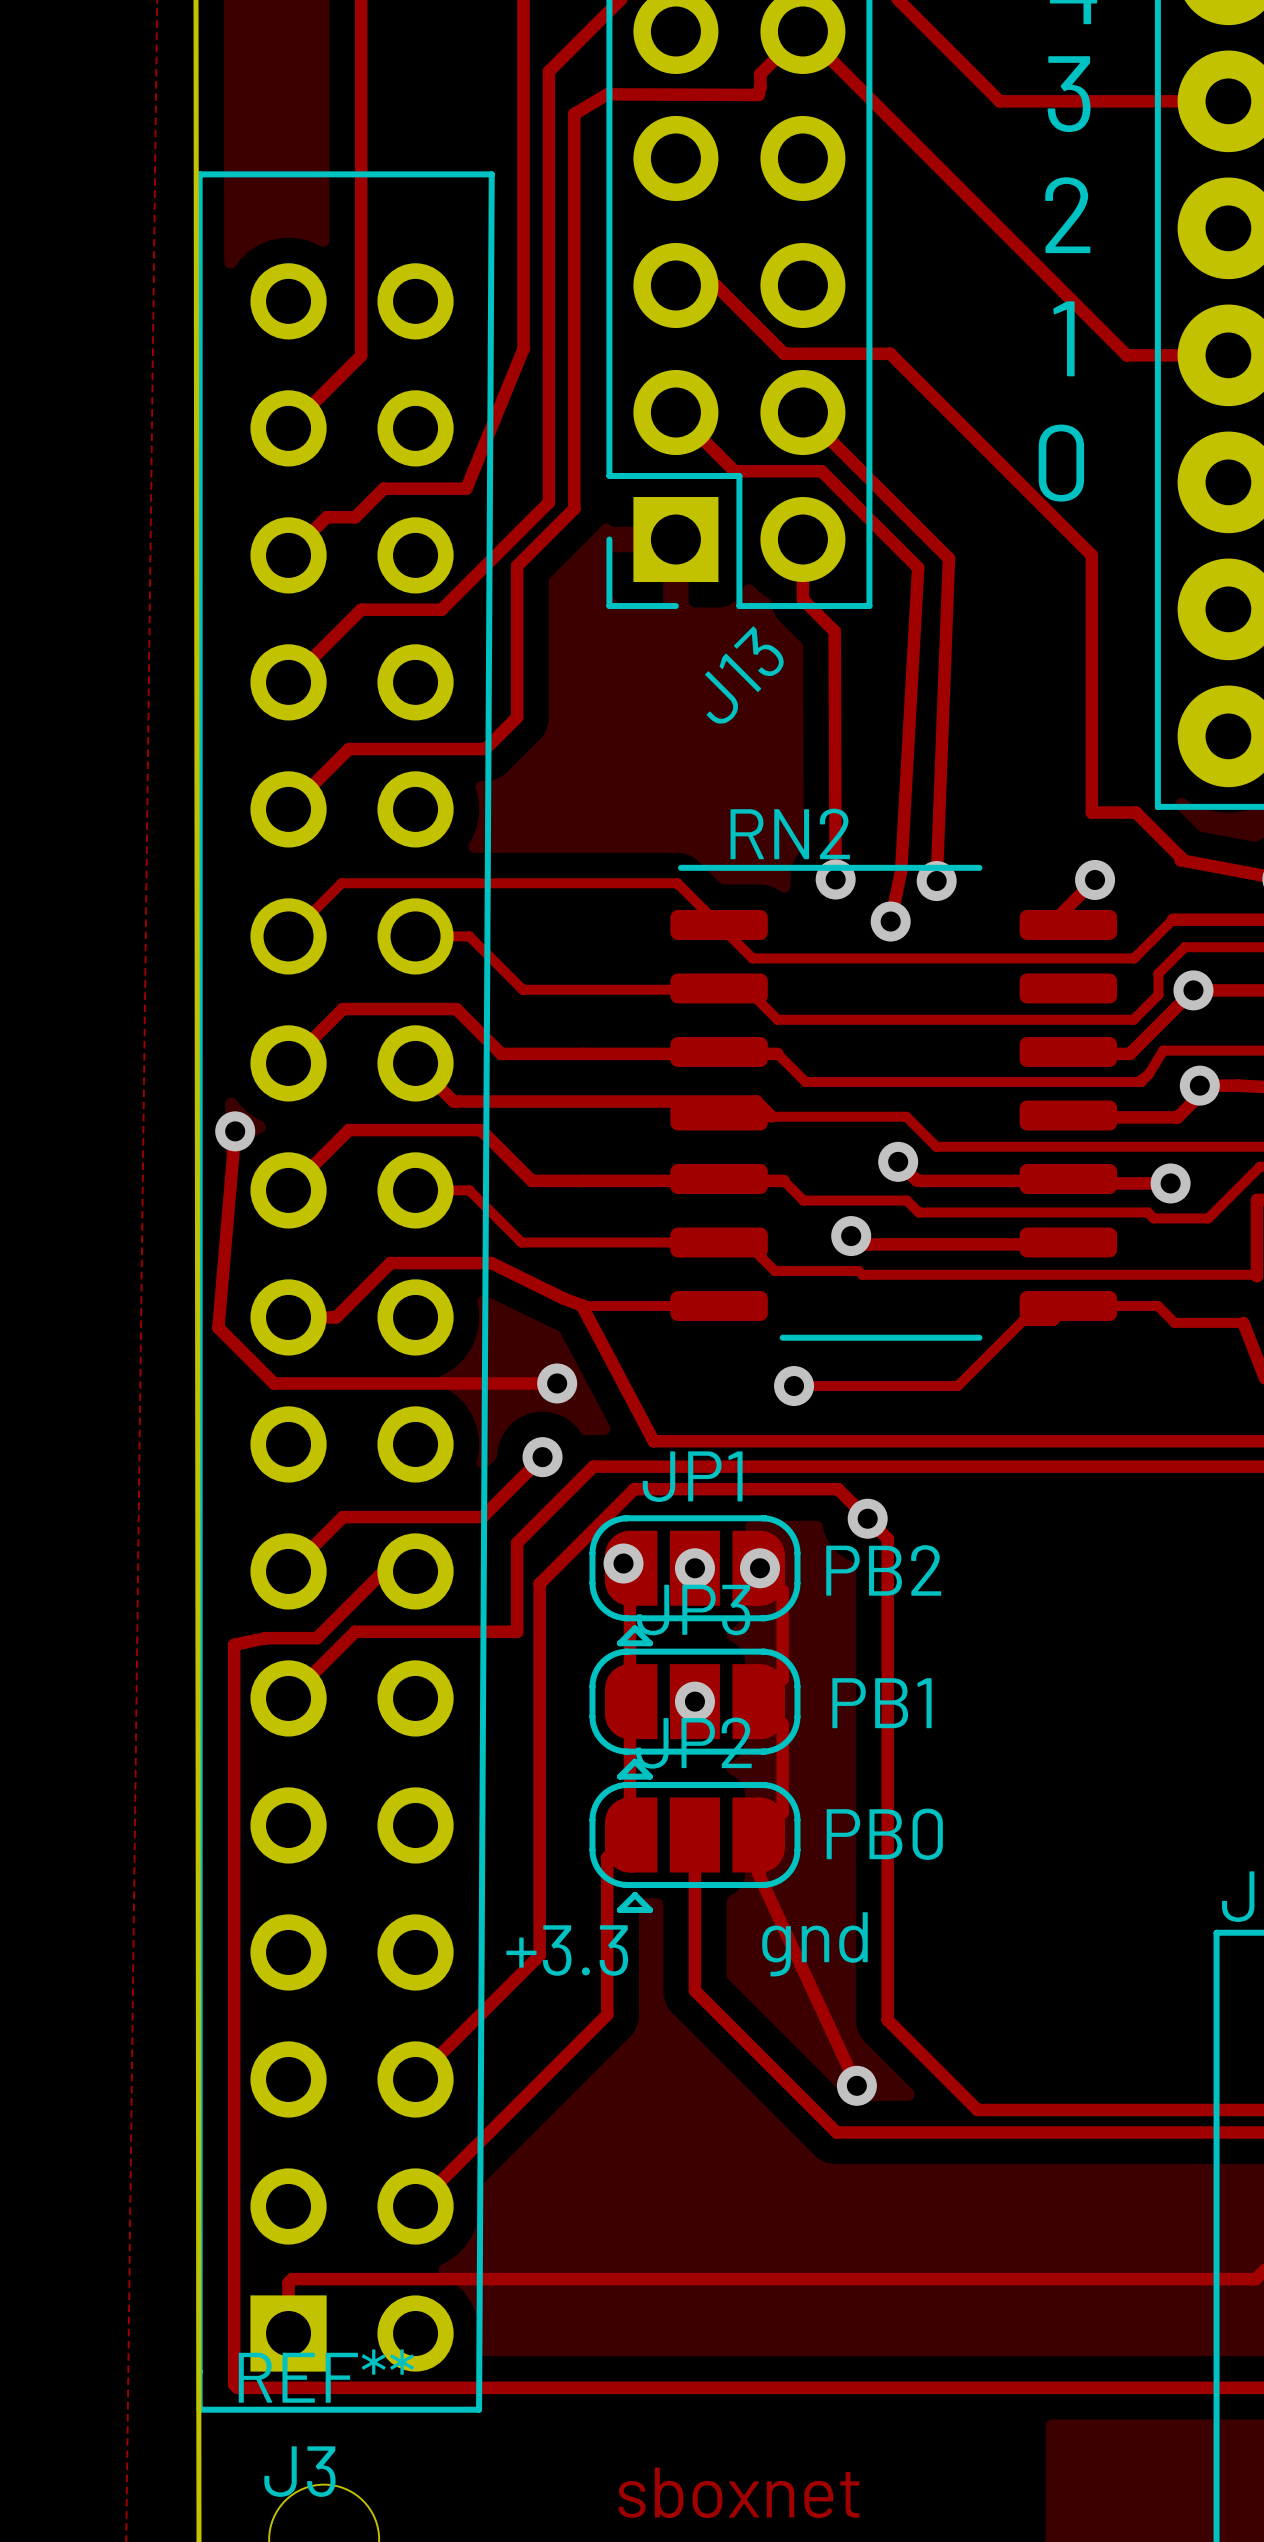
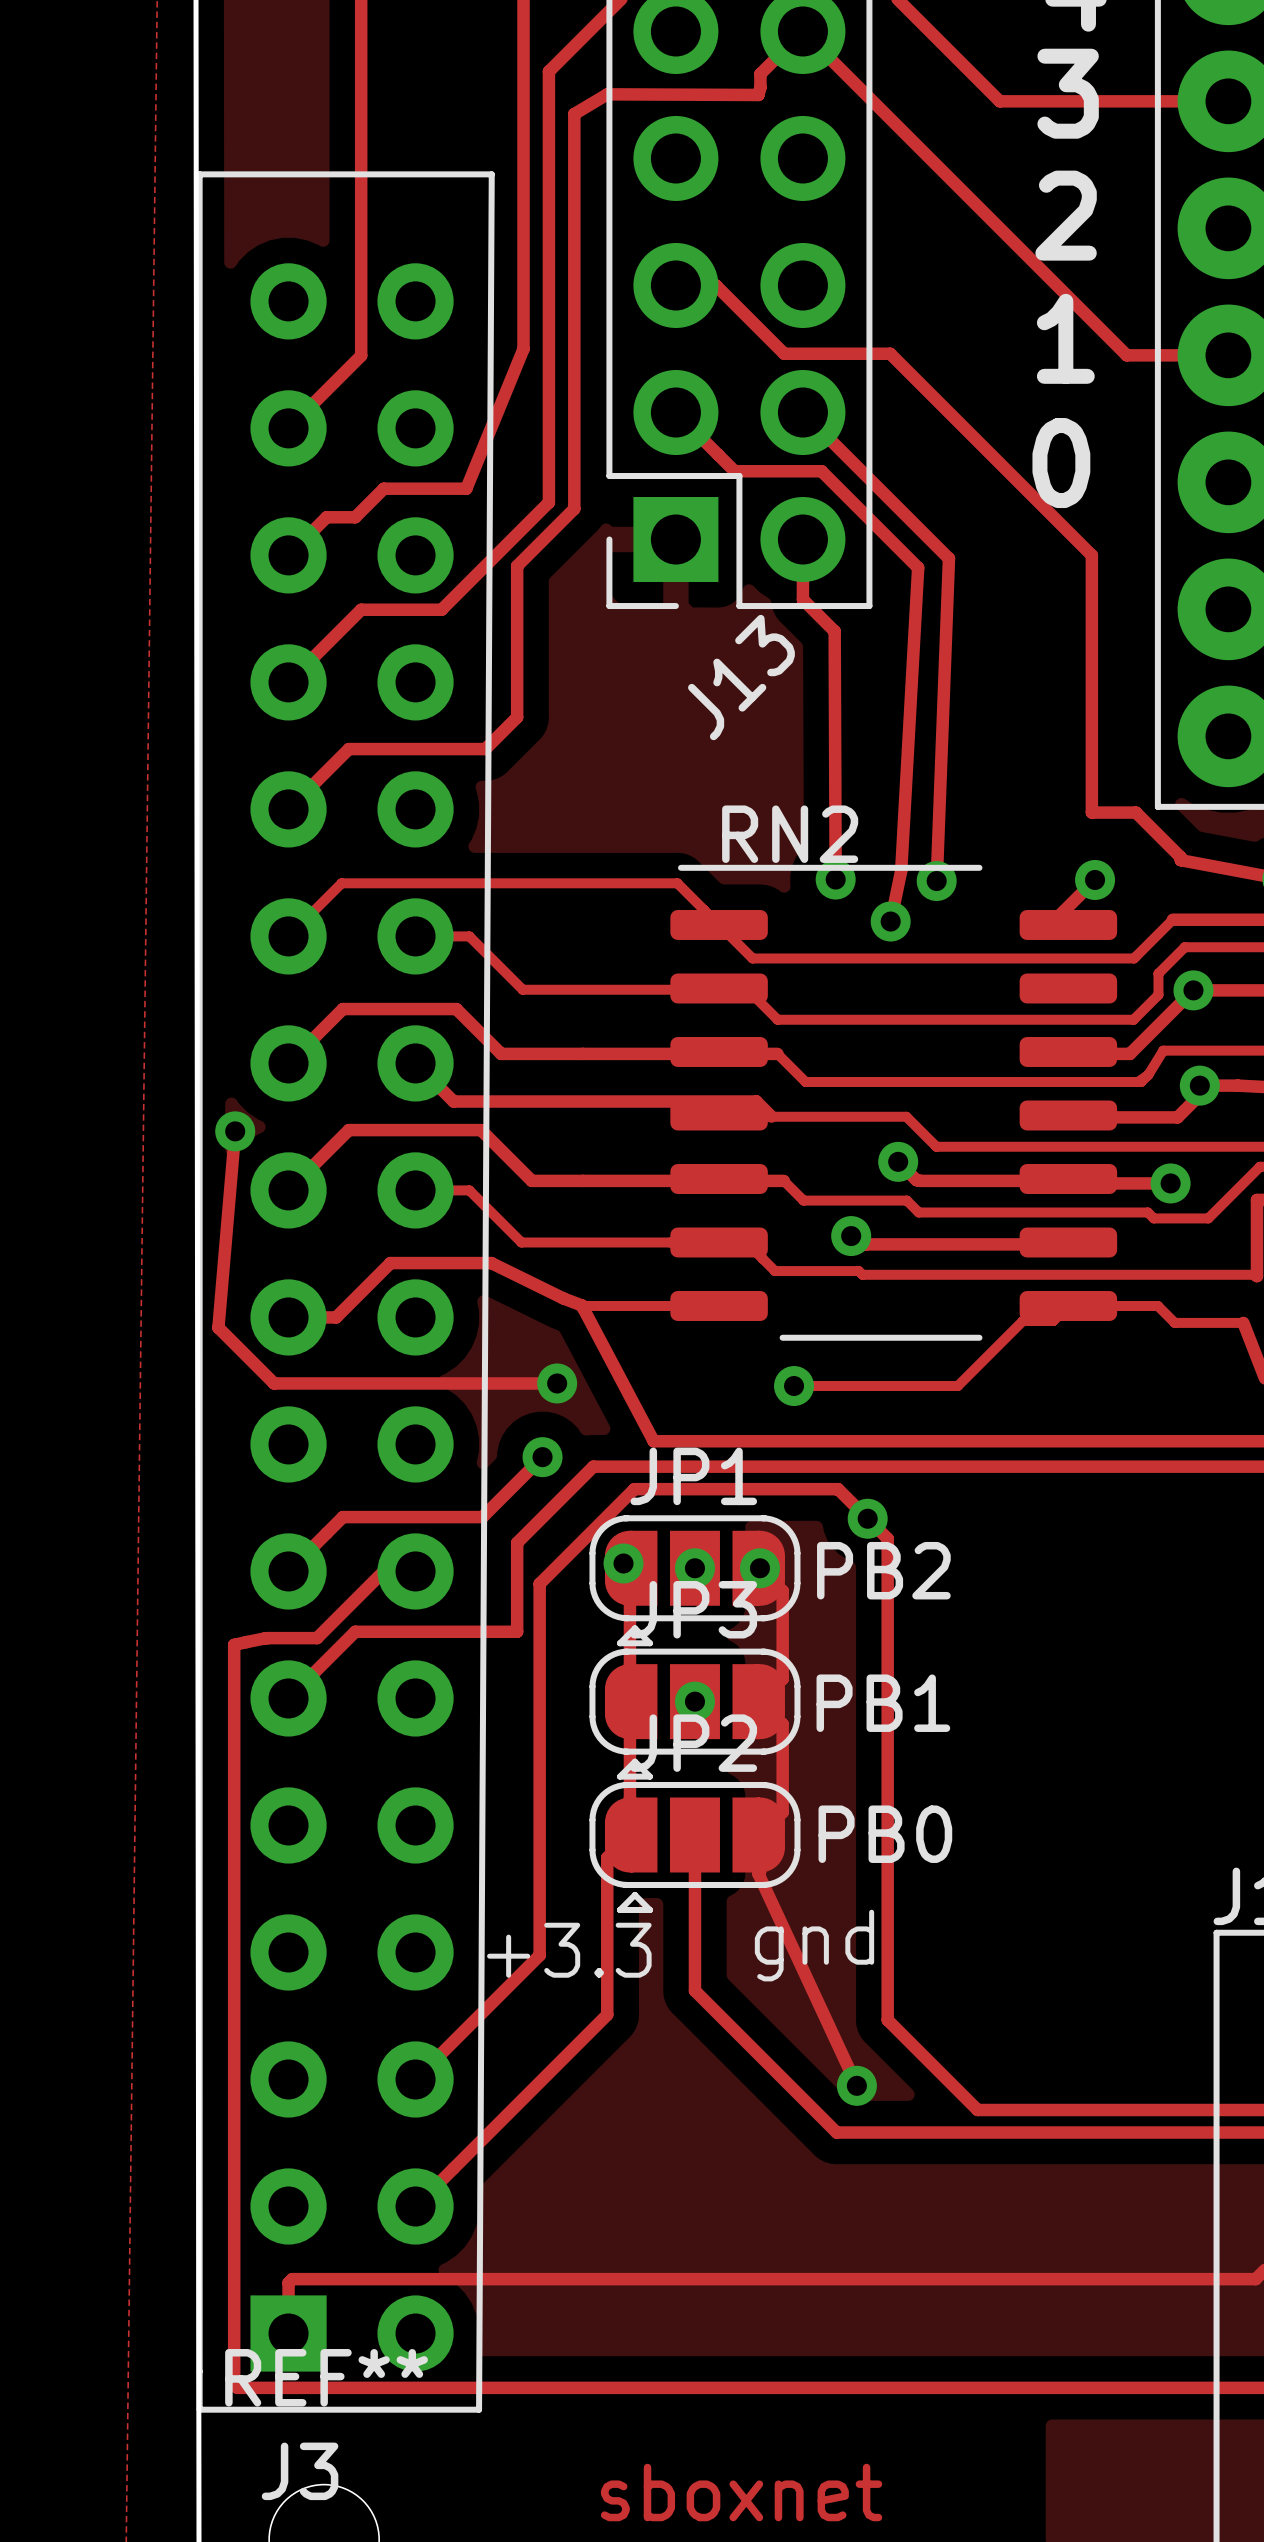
J3 footprint: [196, 171, 495, 2413] -> [196, 171, 495, 2413]

